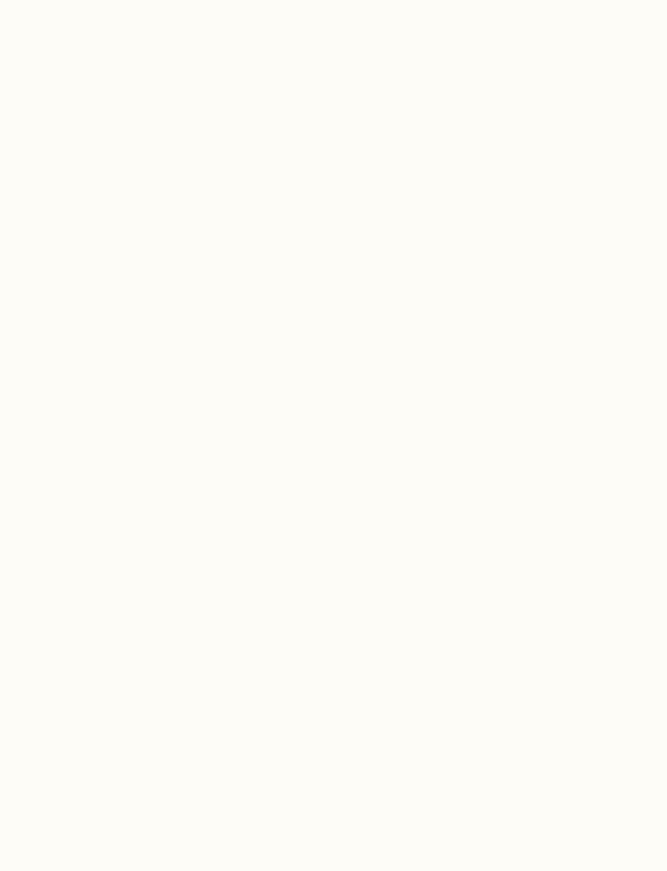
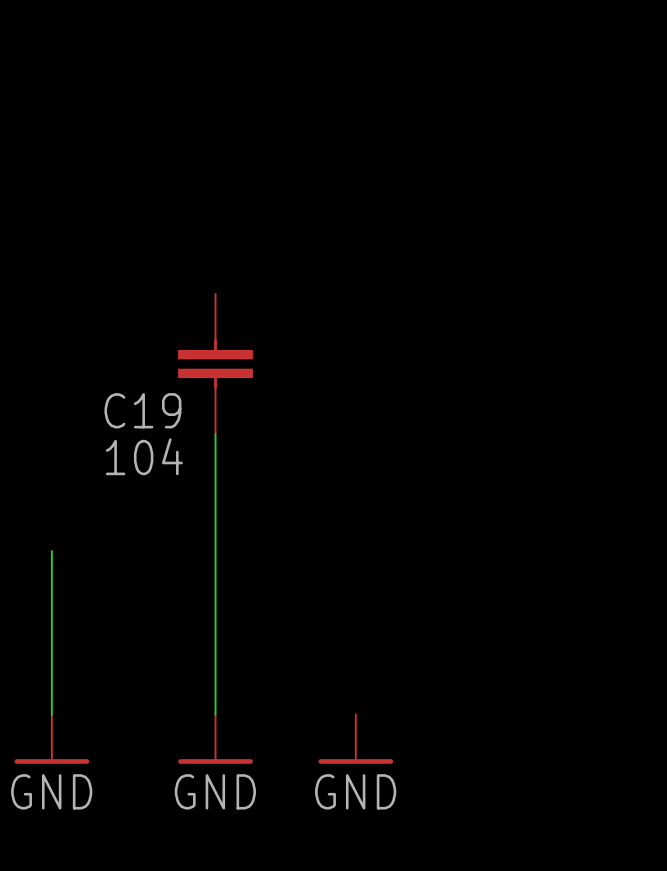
C19: none -> 104 (215, 364)
wire: none -> (215, 434) (215, 714)
wire: none -> (51, 551) (51, 714)
power symbol: none -> GND (51, 739)
power symbol: none -> GND (215, 739)
power symbol: none -> GND (355, 739)

